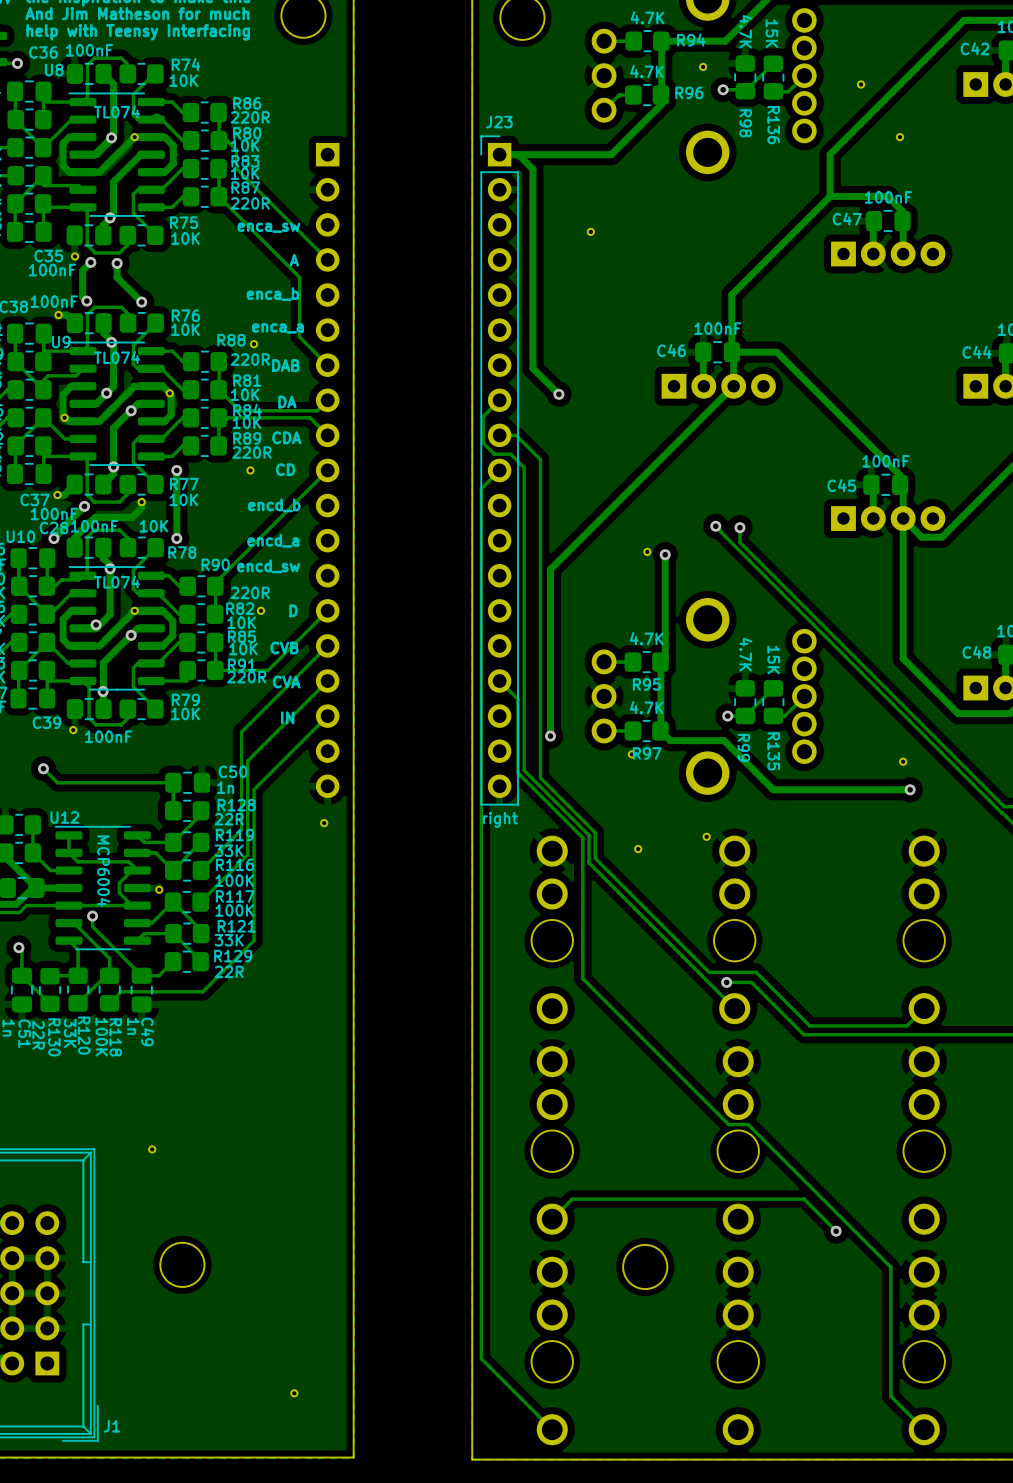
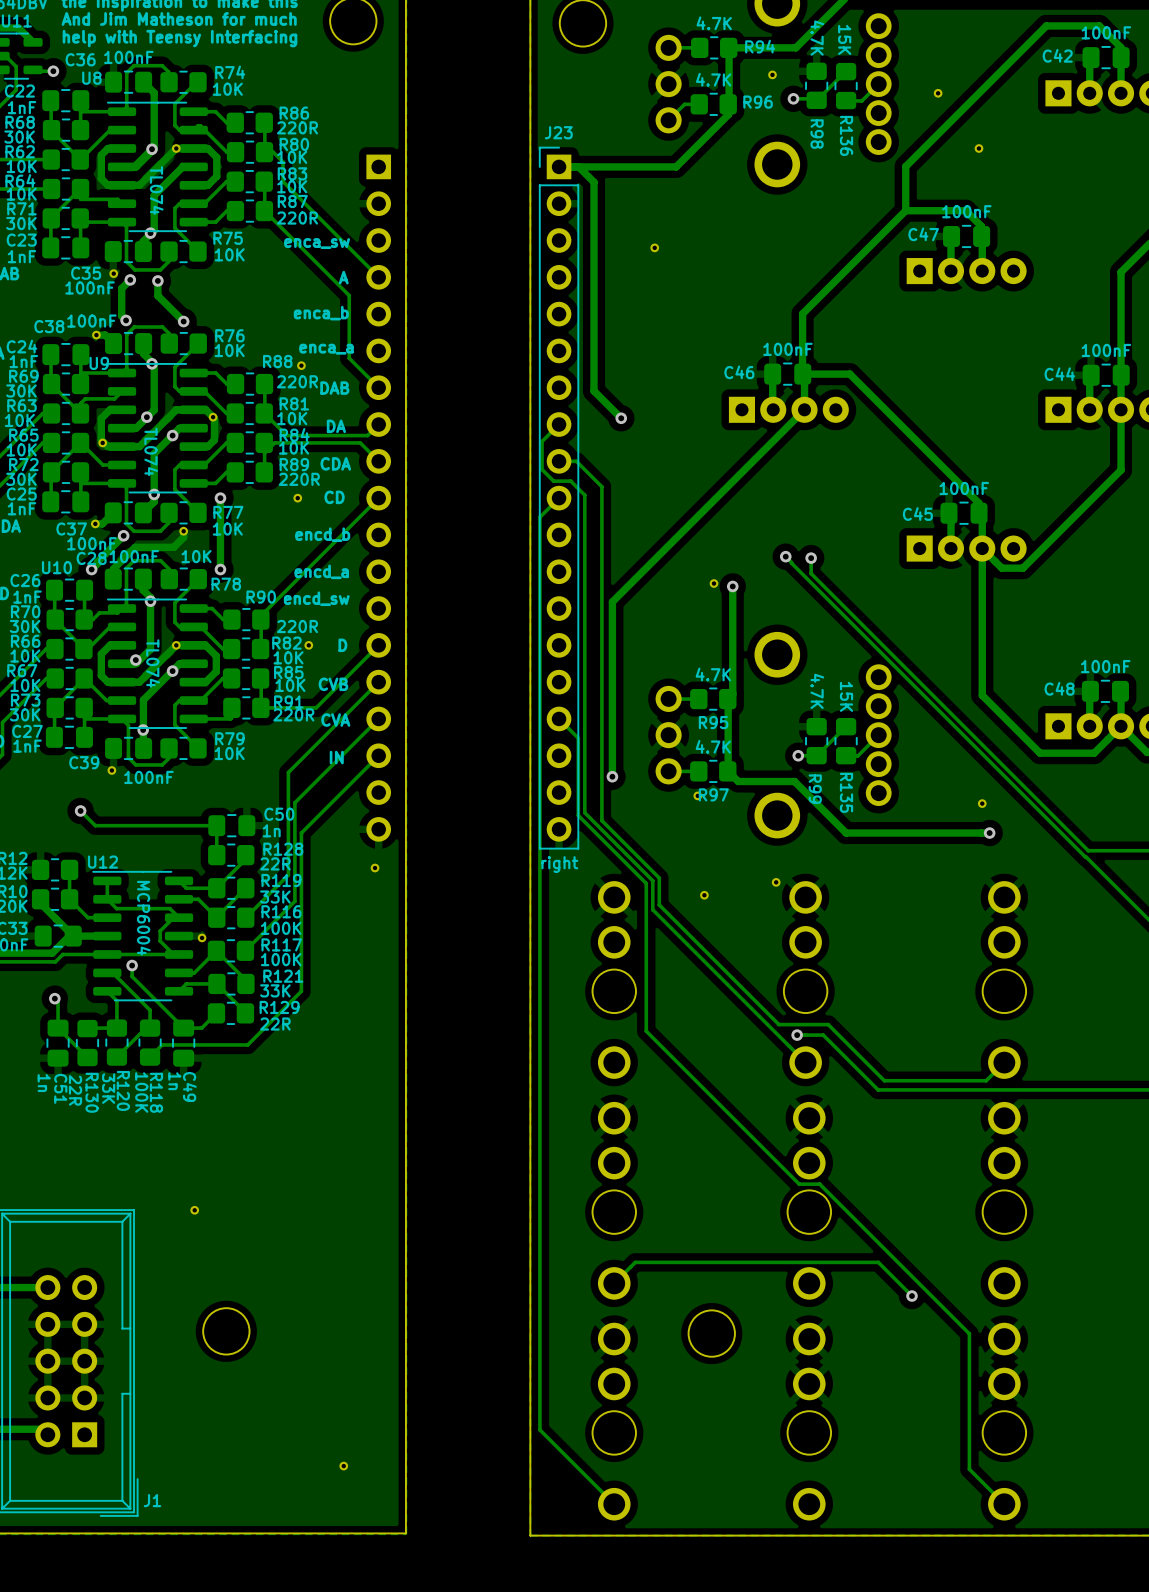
U8 value rotation: 0° (116, 111) -> 90° clockwise (156, 190)
U8 value position: TL074 (116, 111) -> TL074 (156, 190)
U9 value rotation: 0° (116, 357) -> 90° clockwise (151, 451)
U9 value position: TL074 (116, 357) -> TL074 (151, 451)
U10 value rotation: 0° (116, 582) -> 90° clockwise (153, 663)

